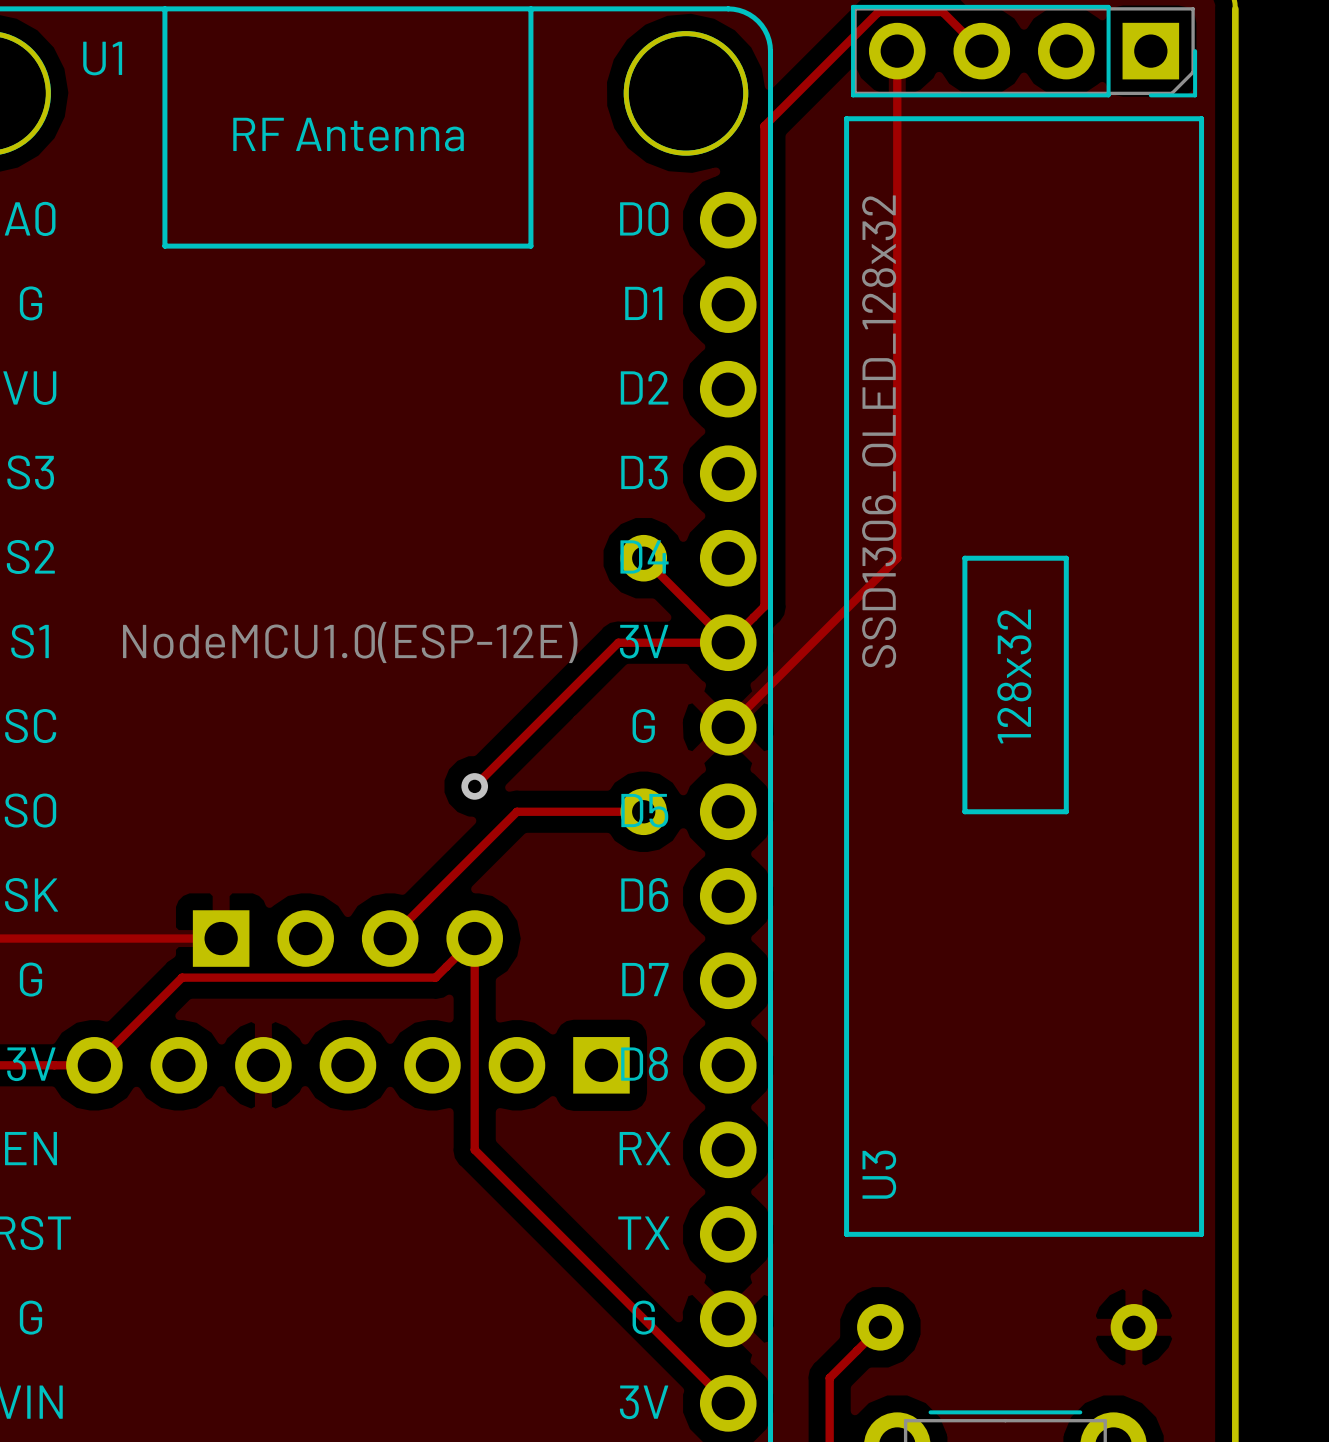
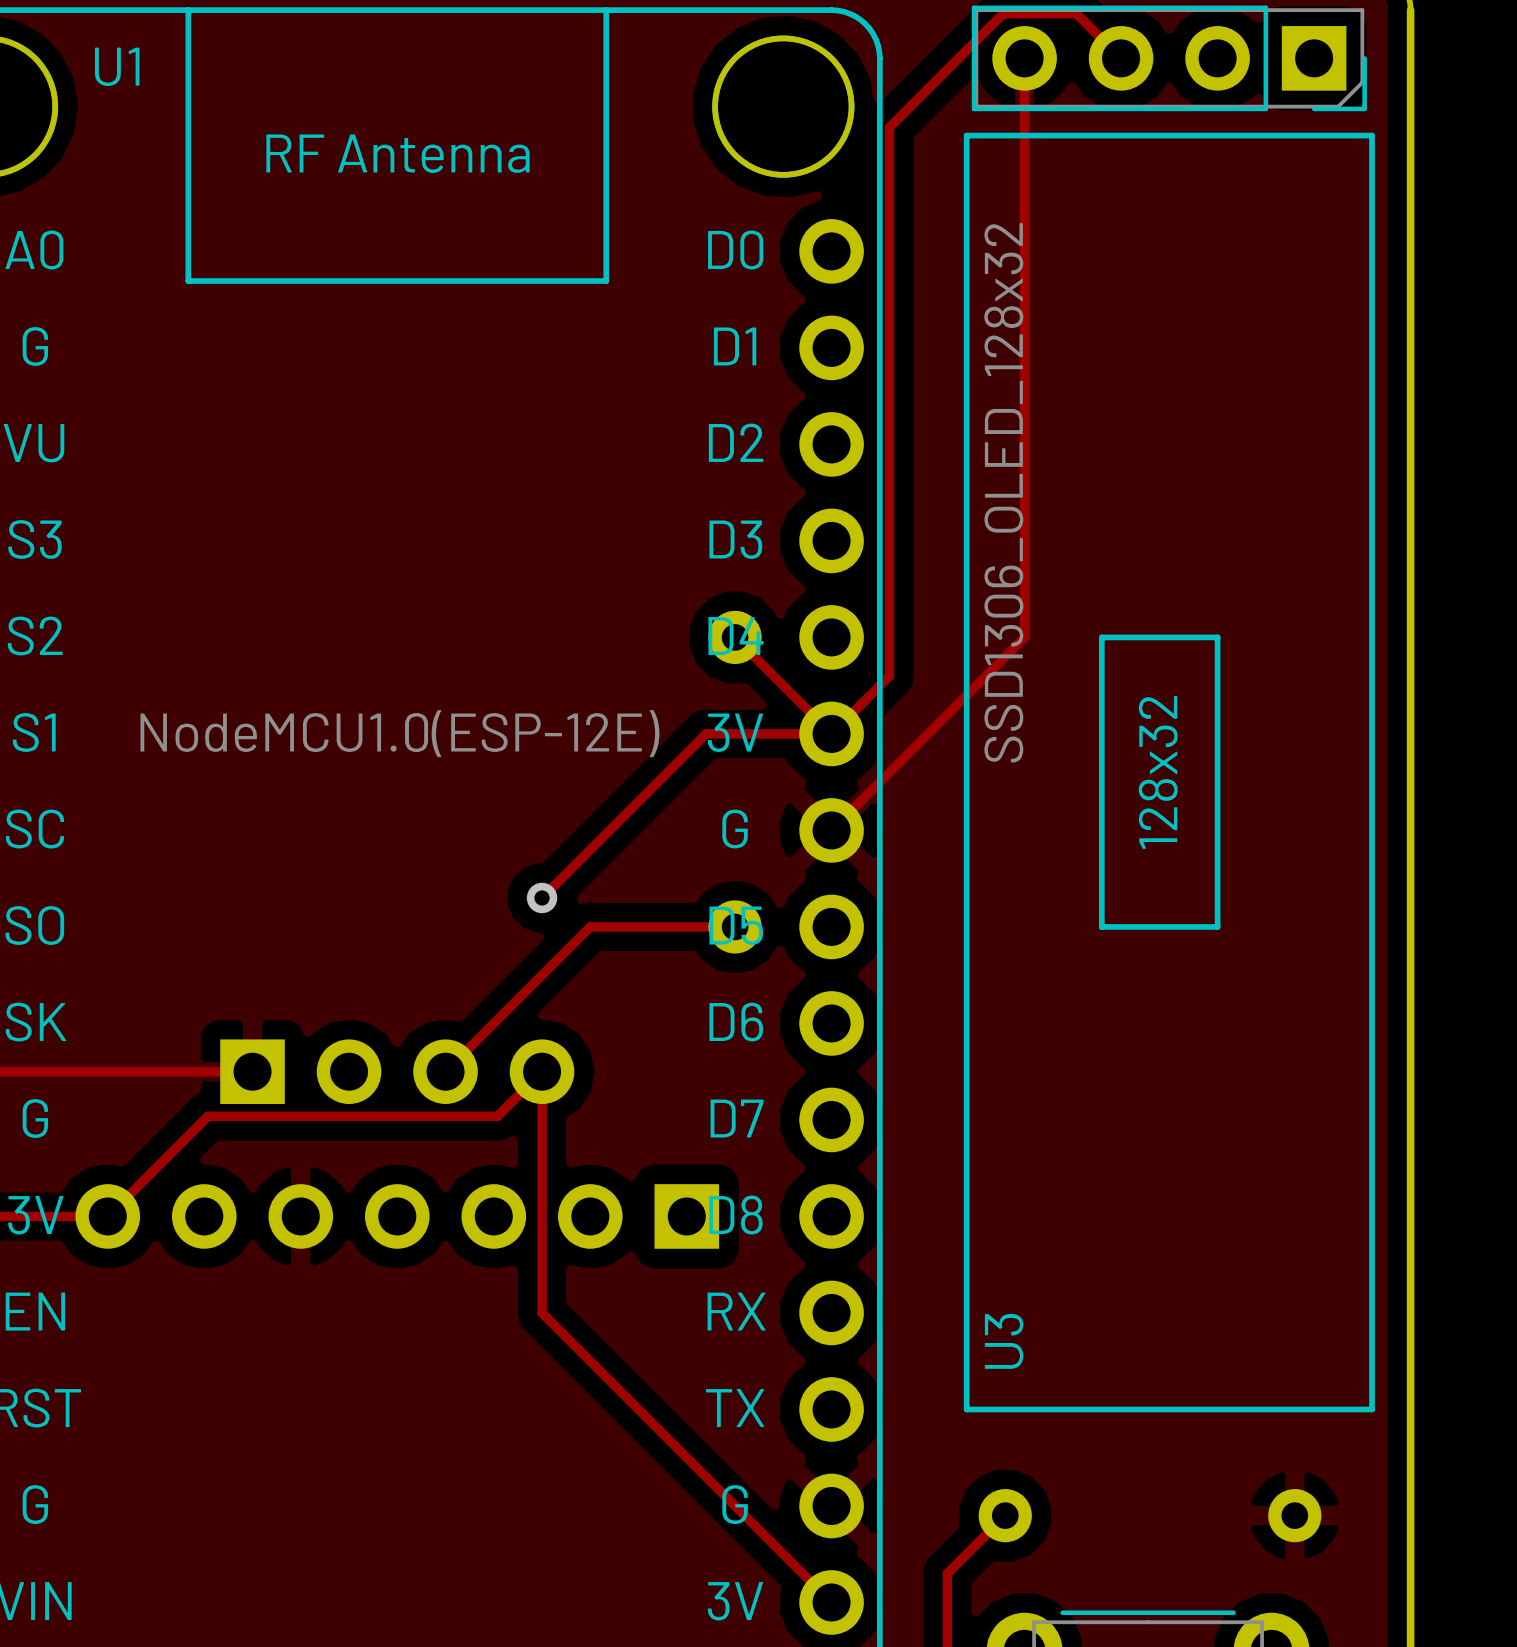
track: (778, 111) (764, 126) (764, 606) -> (889, 127) (889, 676) (872, 692)

